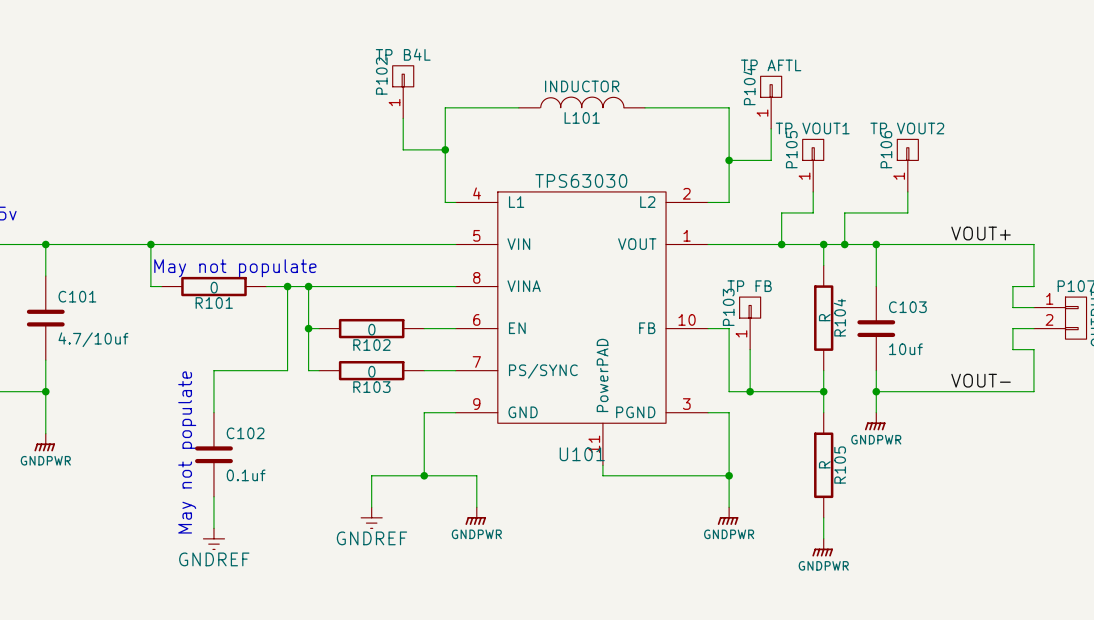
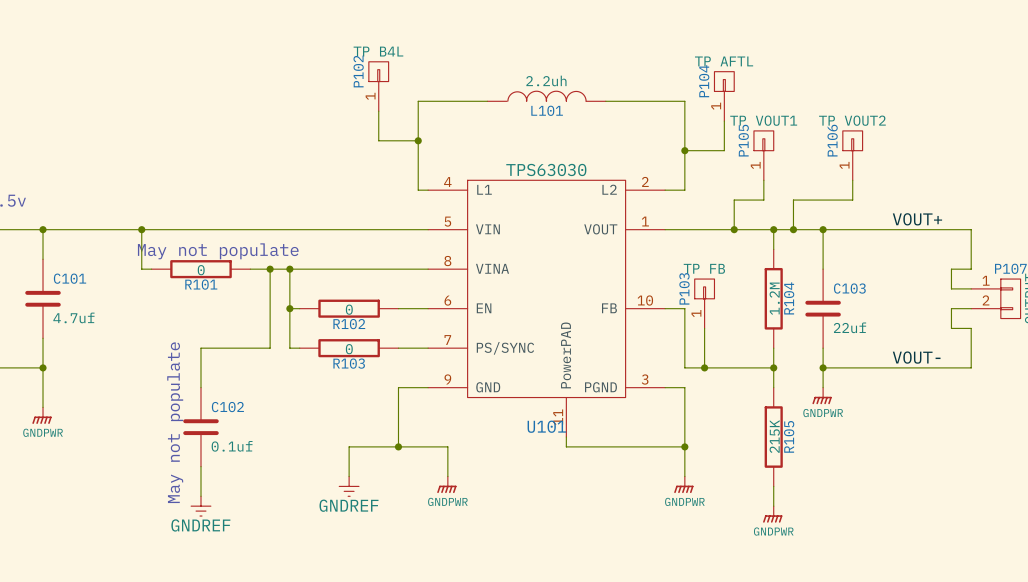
L101 value: INDUCTOR (582, 86) -> 2.2uh (546, 80)
R104 value: R (824, 317) -> 1.2M (774, 298)
C101 value: 4.7/10uf (93, 339) -> 4.7uf (73, 317)
C103 value: 10uf (905, 349) -> 22uf (850, 327)
R105 value: R (824, 464) -> 215K (774, 436)

